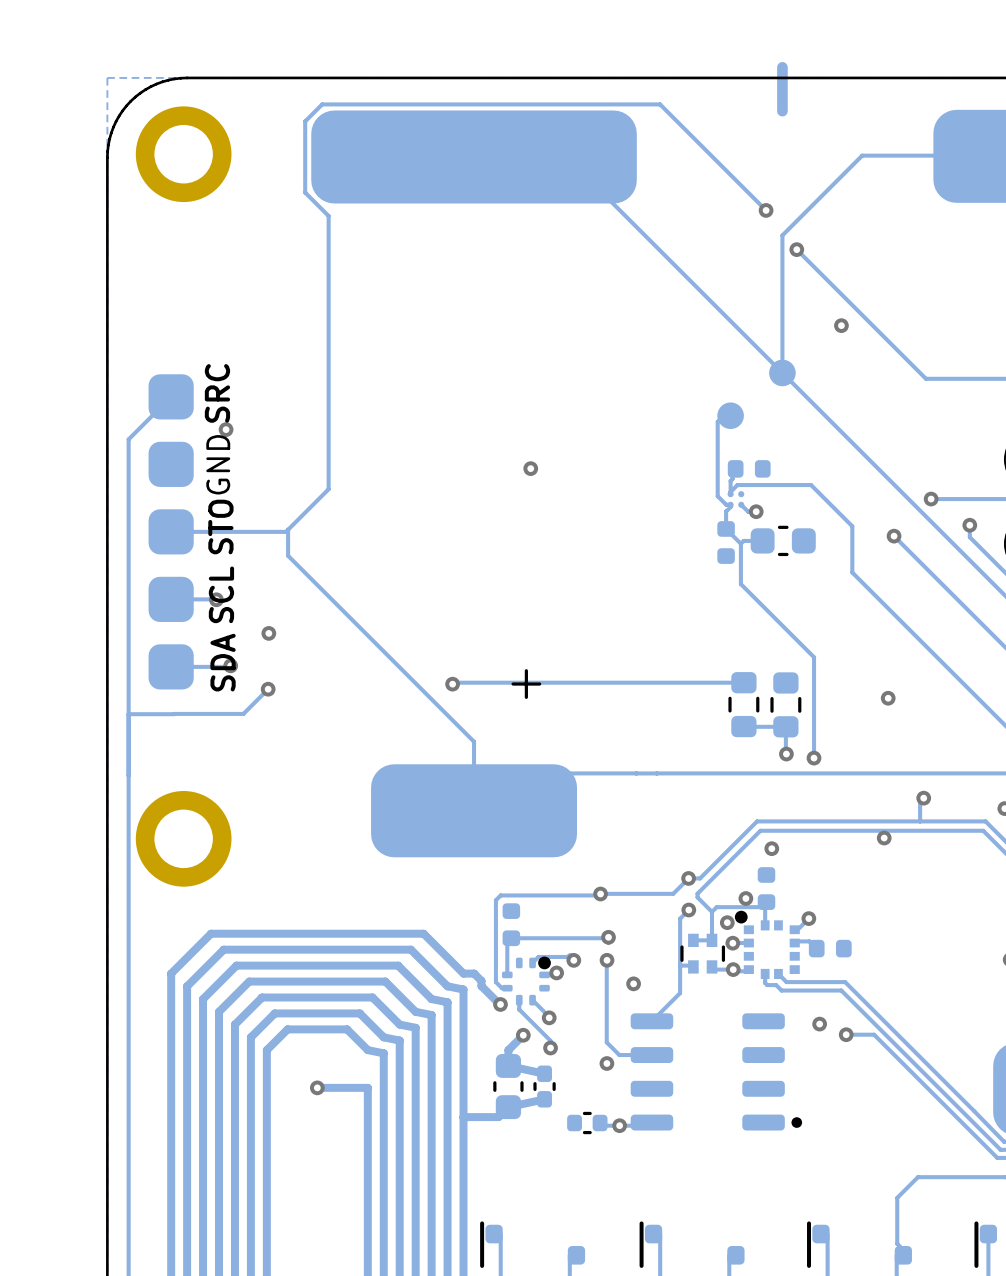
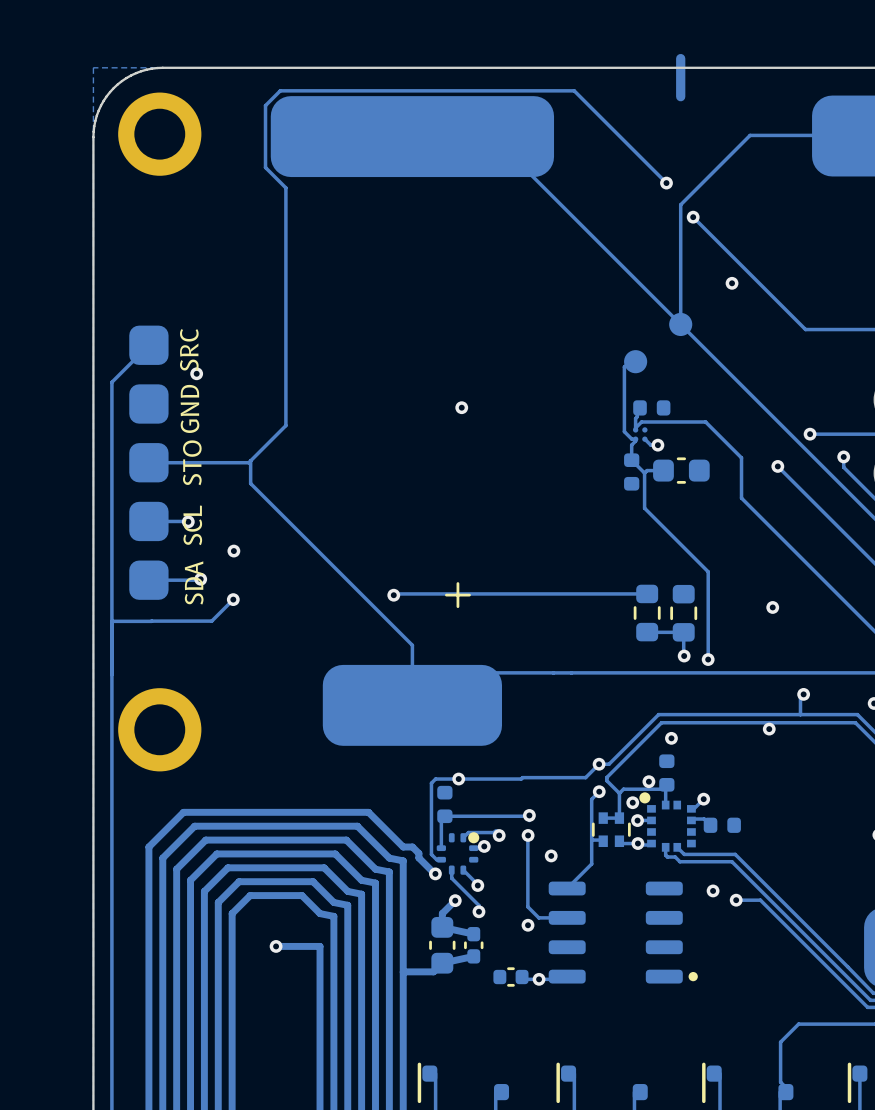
via position: (600, 894) -> (458, 779)

